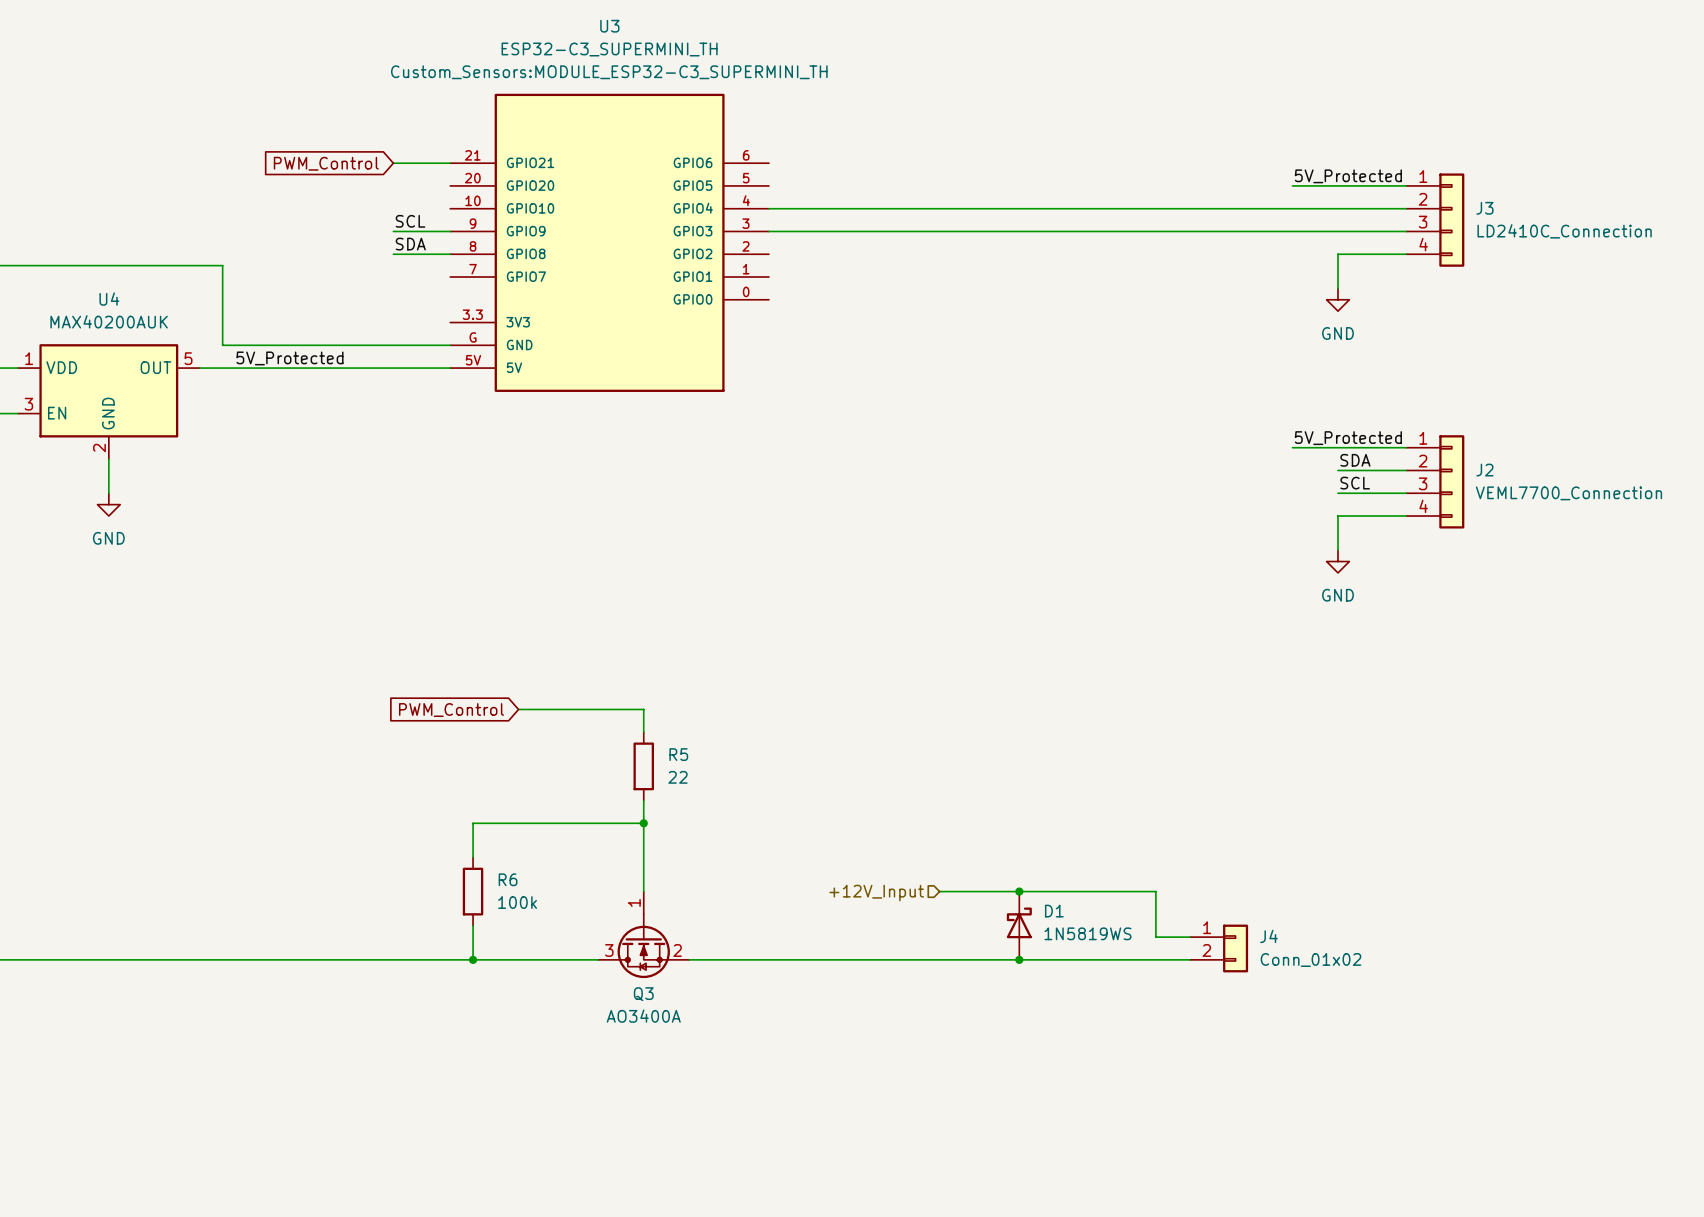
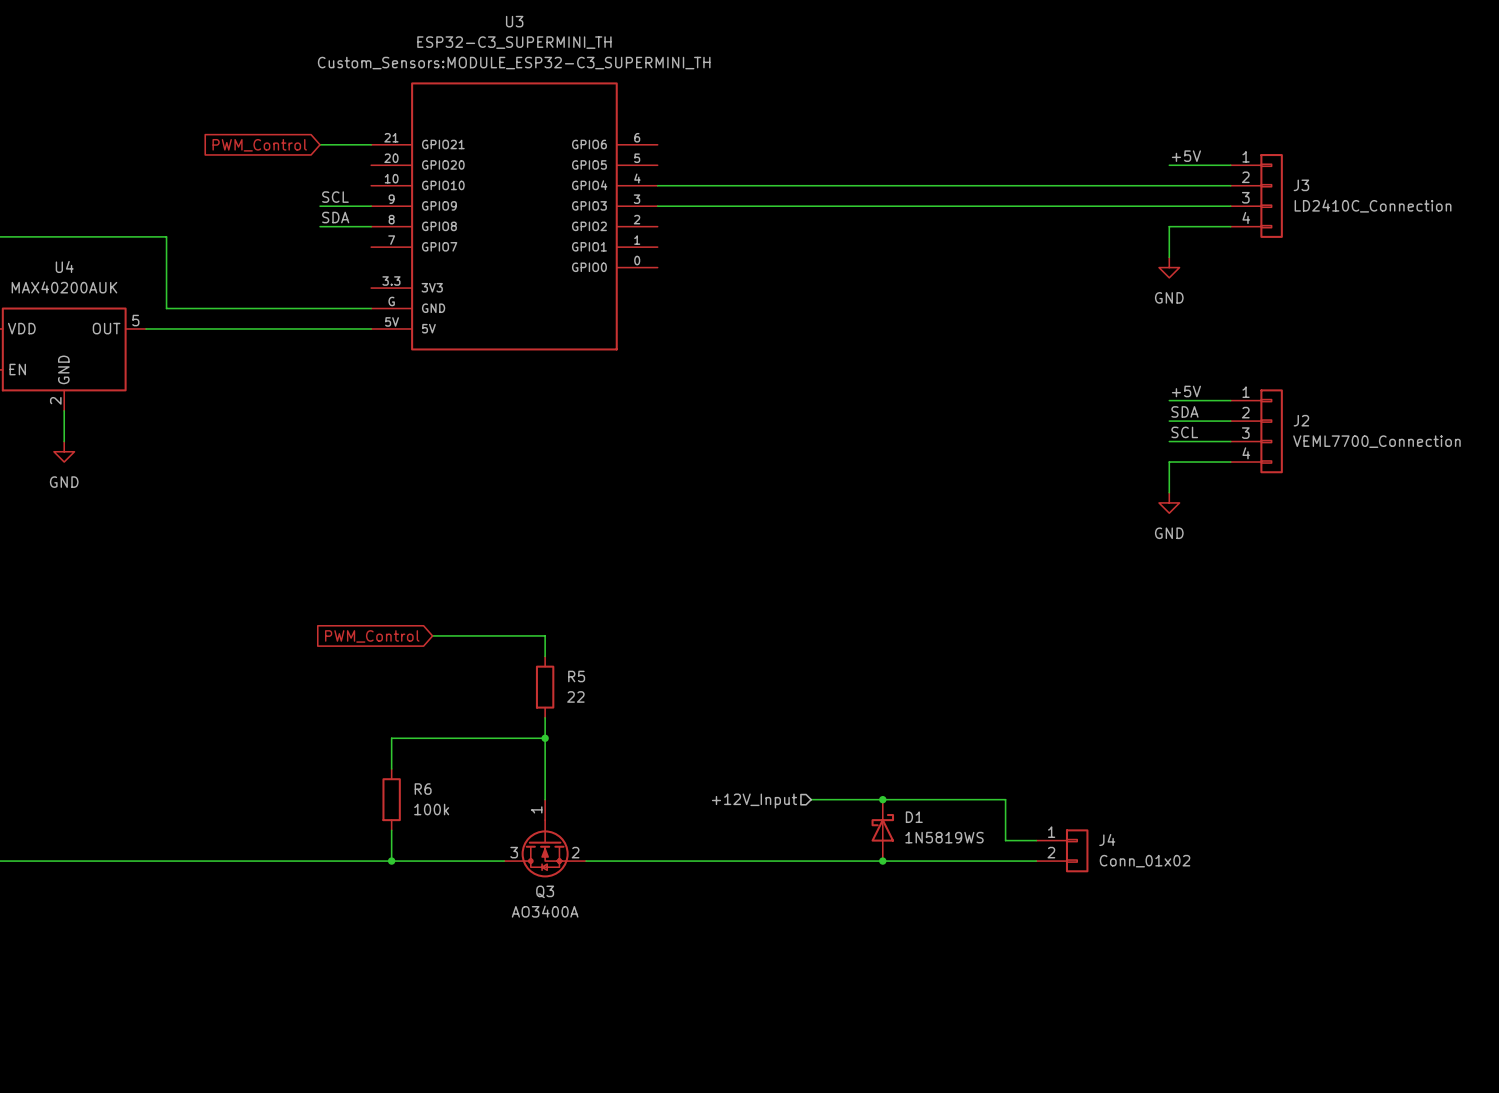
label: none -> +5V (1186, 156)
label: 5V_Protected (1348, 176) -> none
wire: (1292, 185) (1337, 185) -> none
label: 5V_Protected (289, 358) -> none
label: none -> +5V (1186, 391)
label: 5V_Protected (1348, 438) -> none
wire: (1292, 447) (1337, 447) -> none

